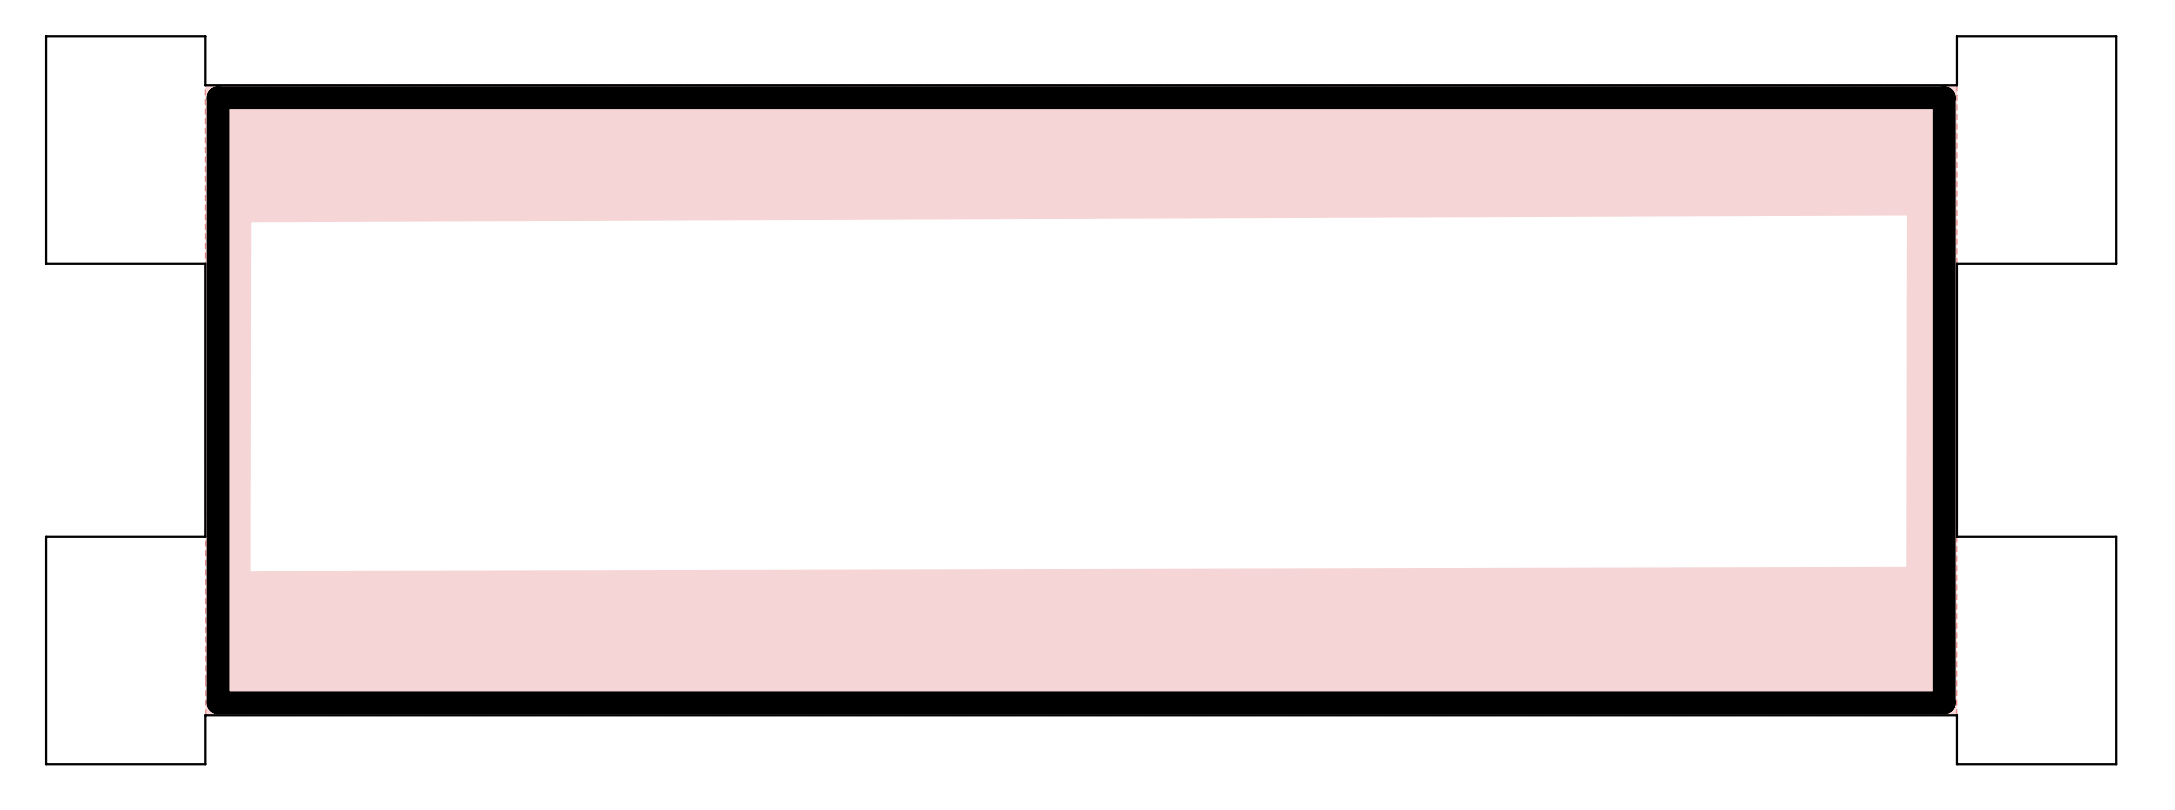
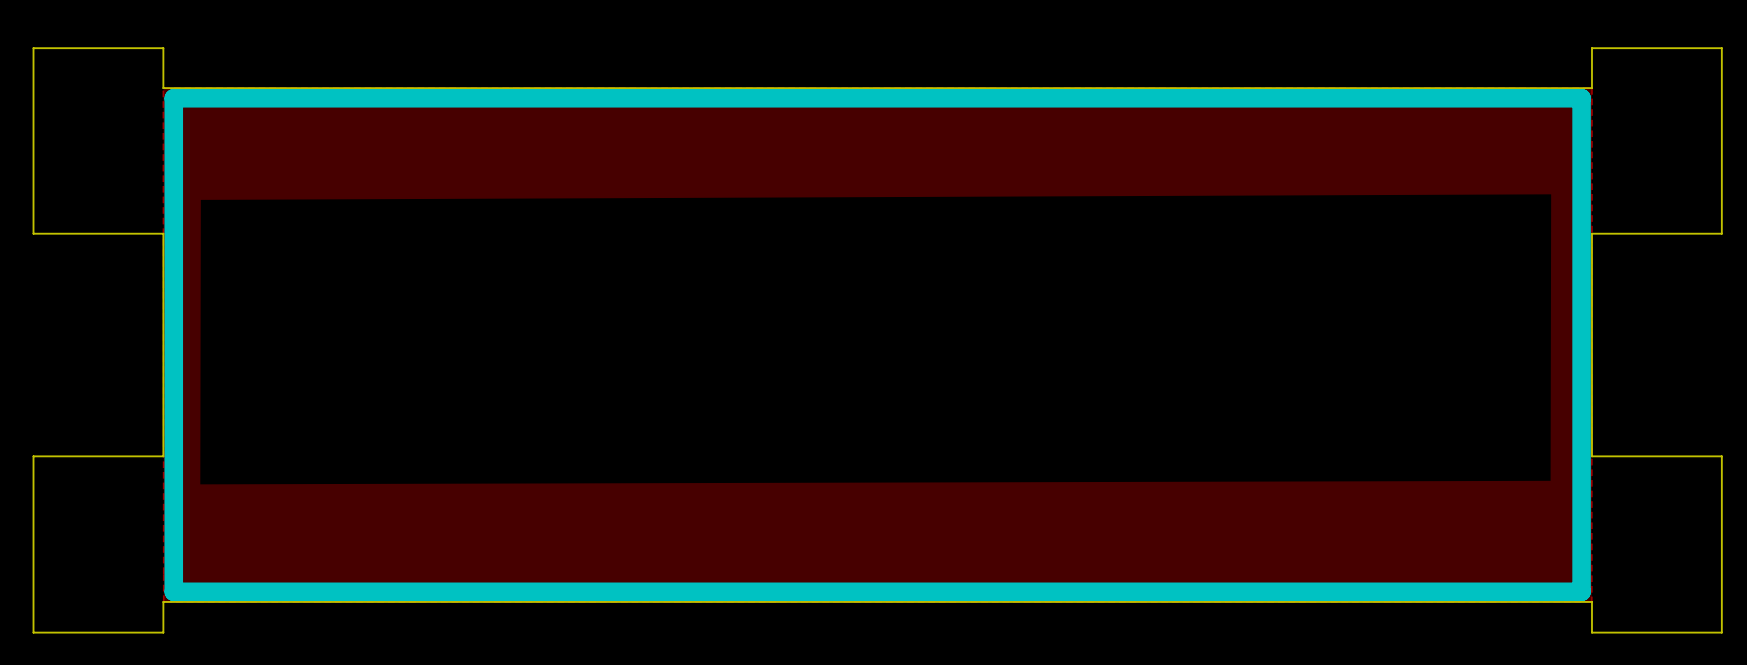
drawing shape: [44, 35, 2118, 766] -> [32, 47, 1723, 634]

